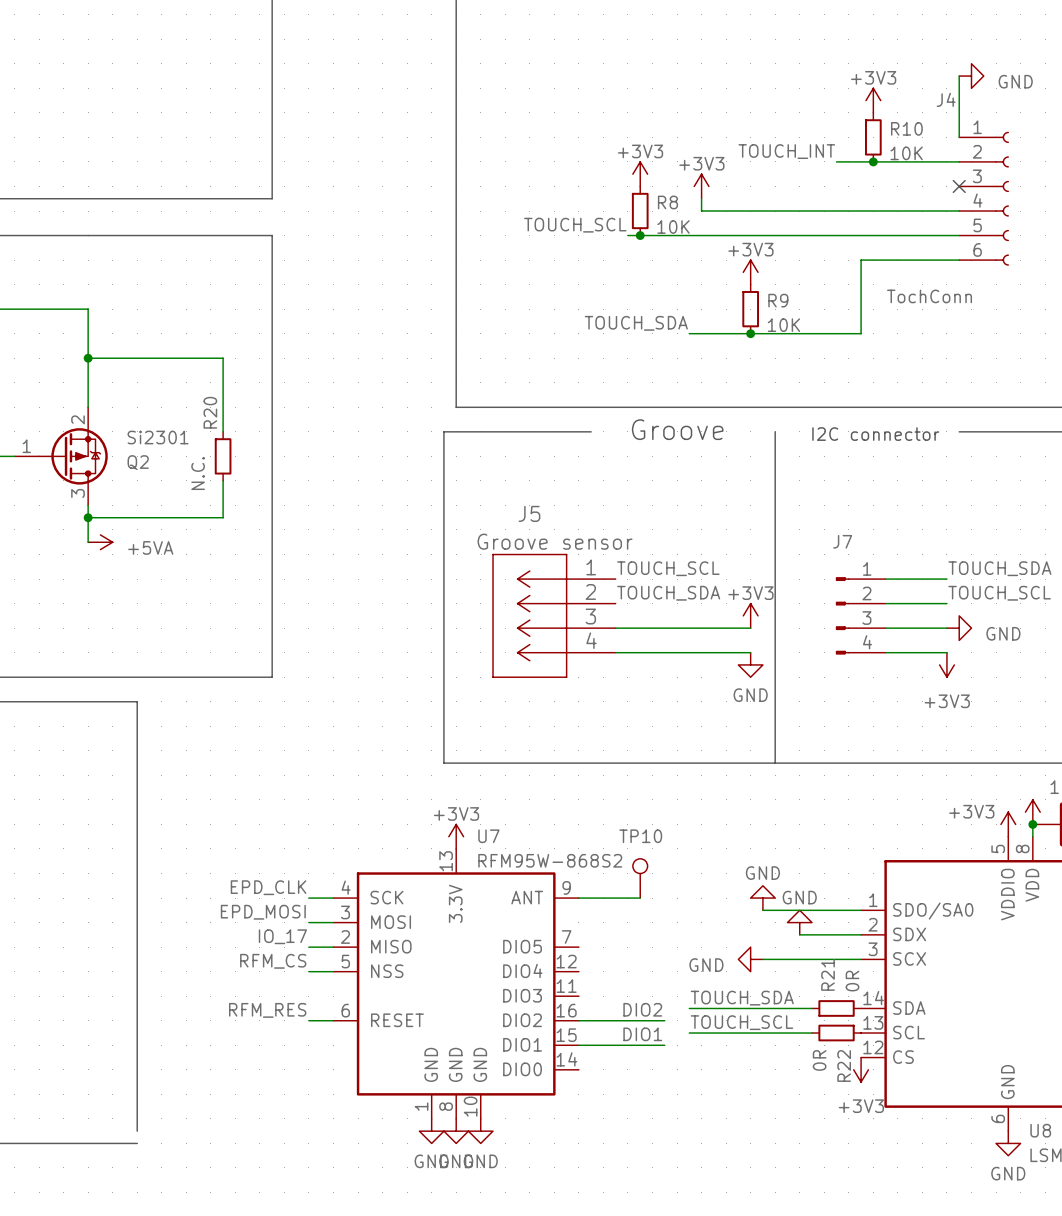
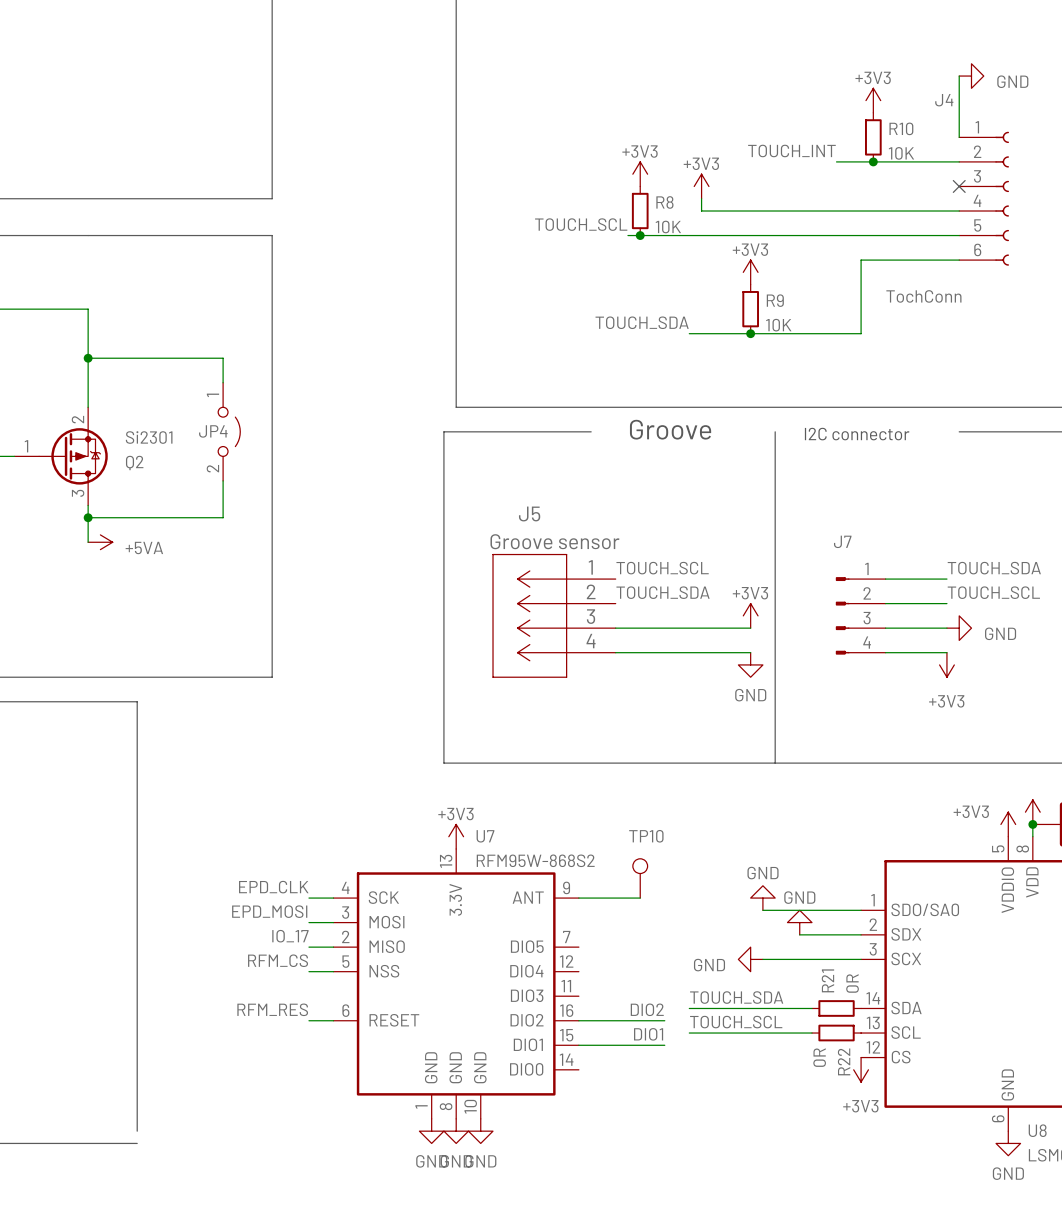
JP4: none -> (229, 431)
R20: N.C. (223, 456) -> none

